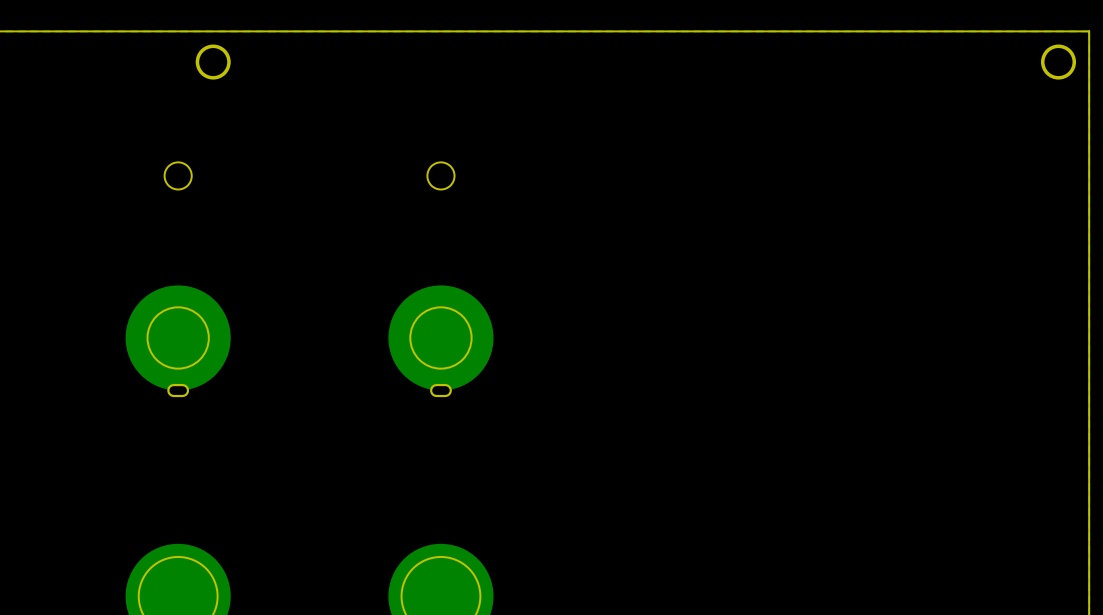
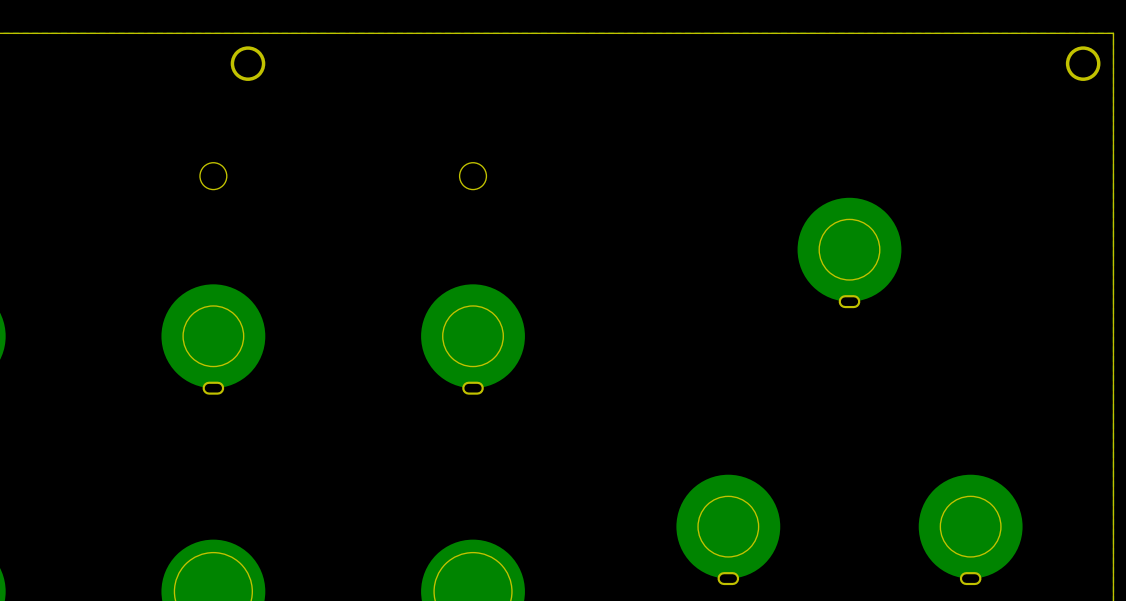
part: none -> (849, 252)
part: none -> (728, 529)
part: none -> (970, 529)

